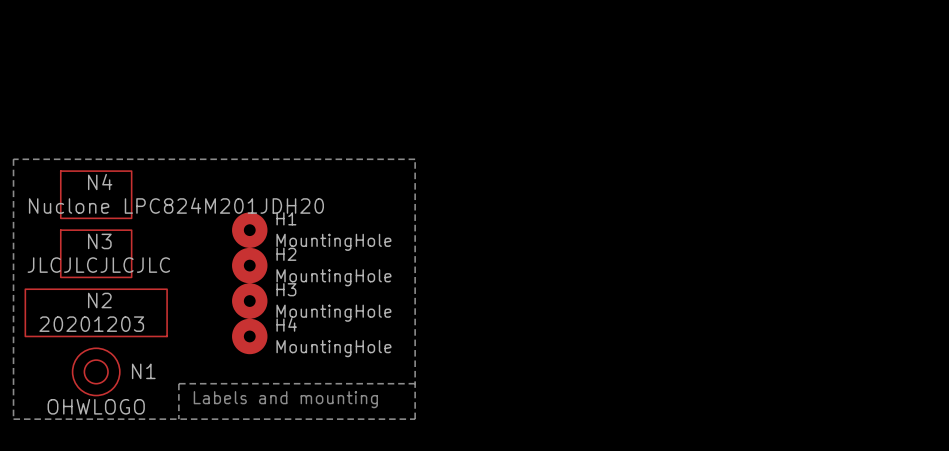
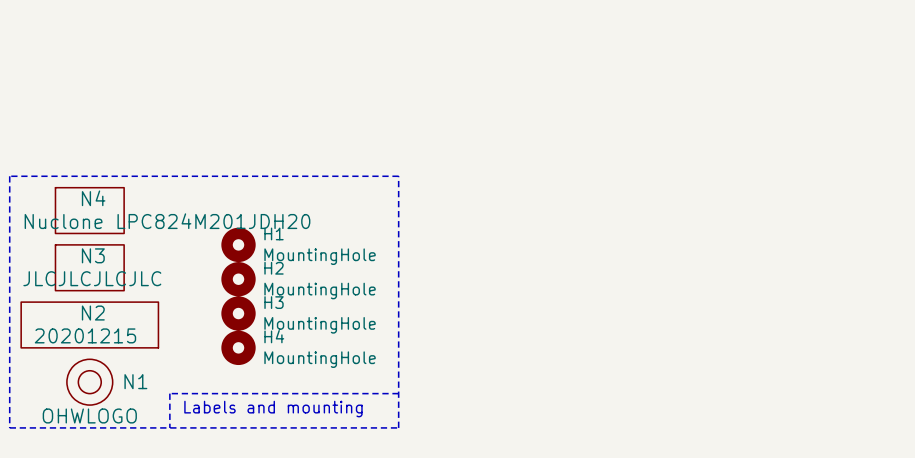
N2 value: 20201203 (91, 324) -> 20201215 (85, 335)

